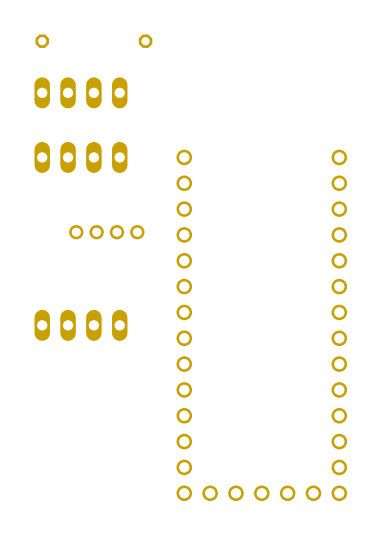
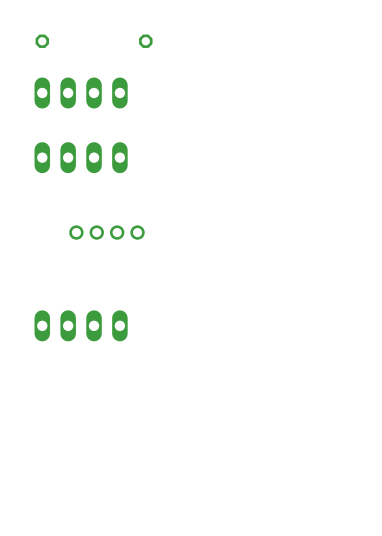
part: (261, 325) -> none

